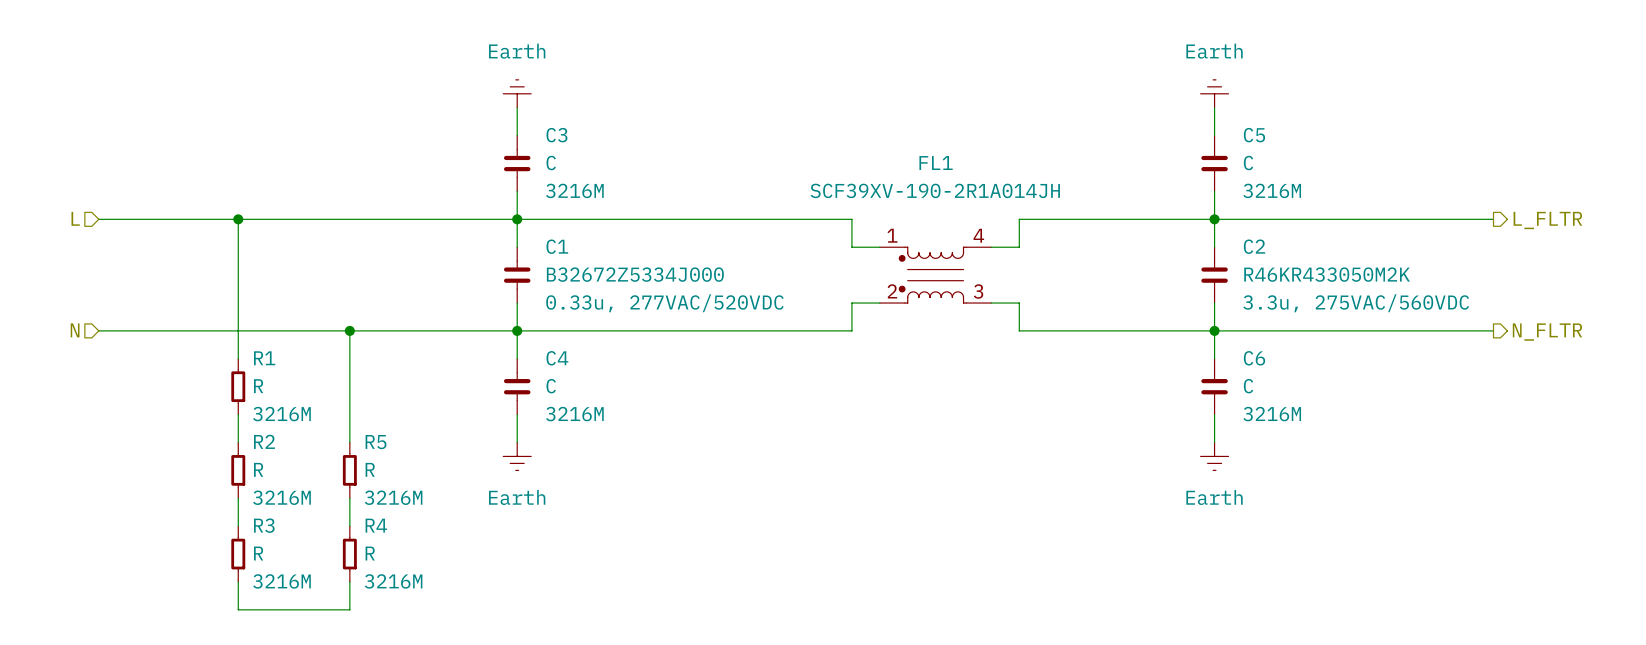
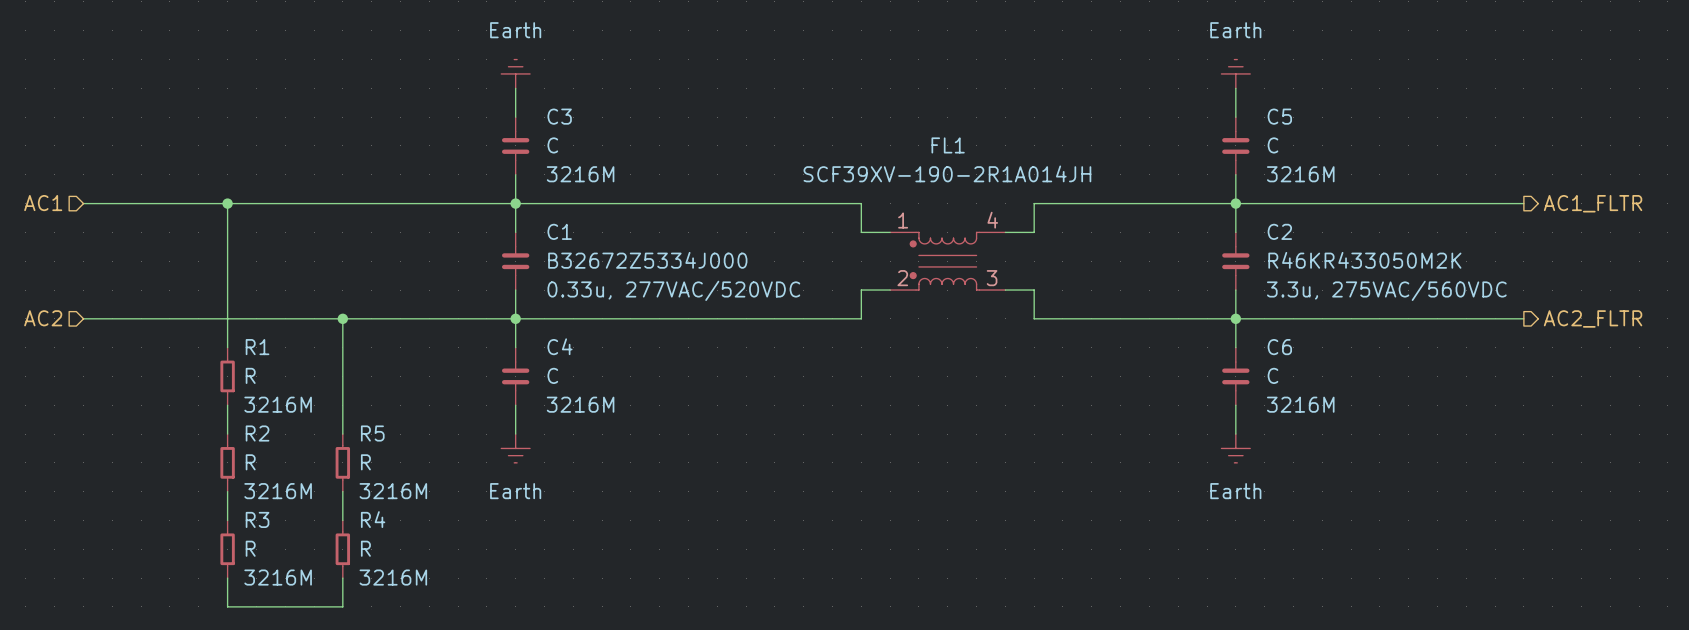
hierarchical label: L (75, 218) -> AC1 (43, 203)
hierarchical label: L_FLTR (1547, 220) -> AC1_FLTR (1593, 203)
hierarchical label: N (75, 330) -> AC2 (43, 318)
hierarchical label: N_FLTR (1547, 332) -> AC2_FLTR (1593, 318)

